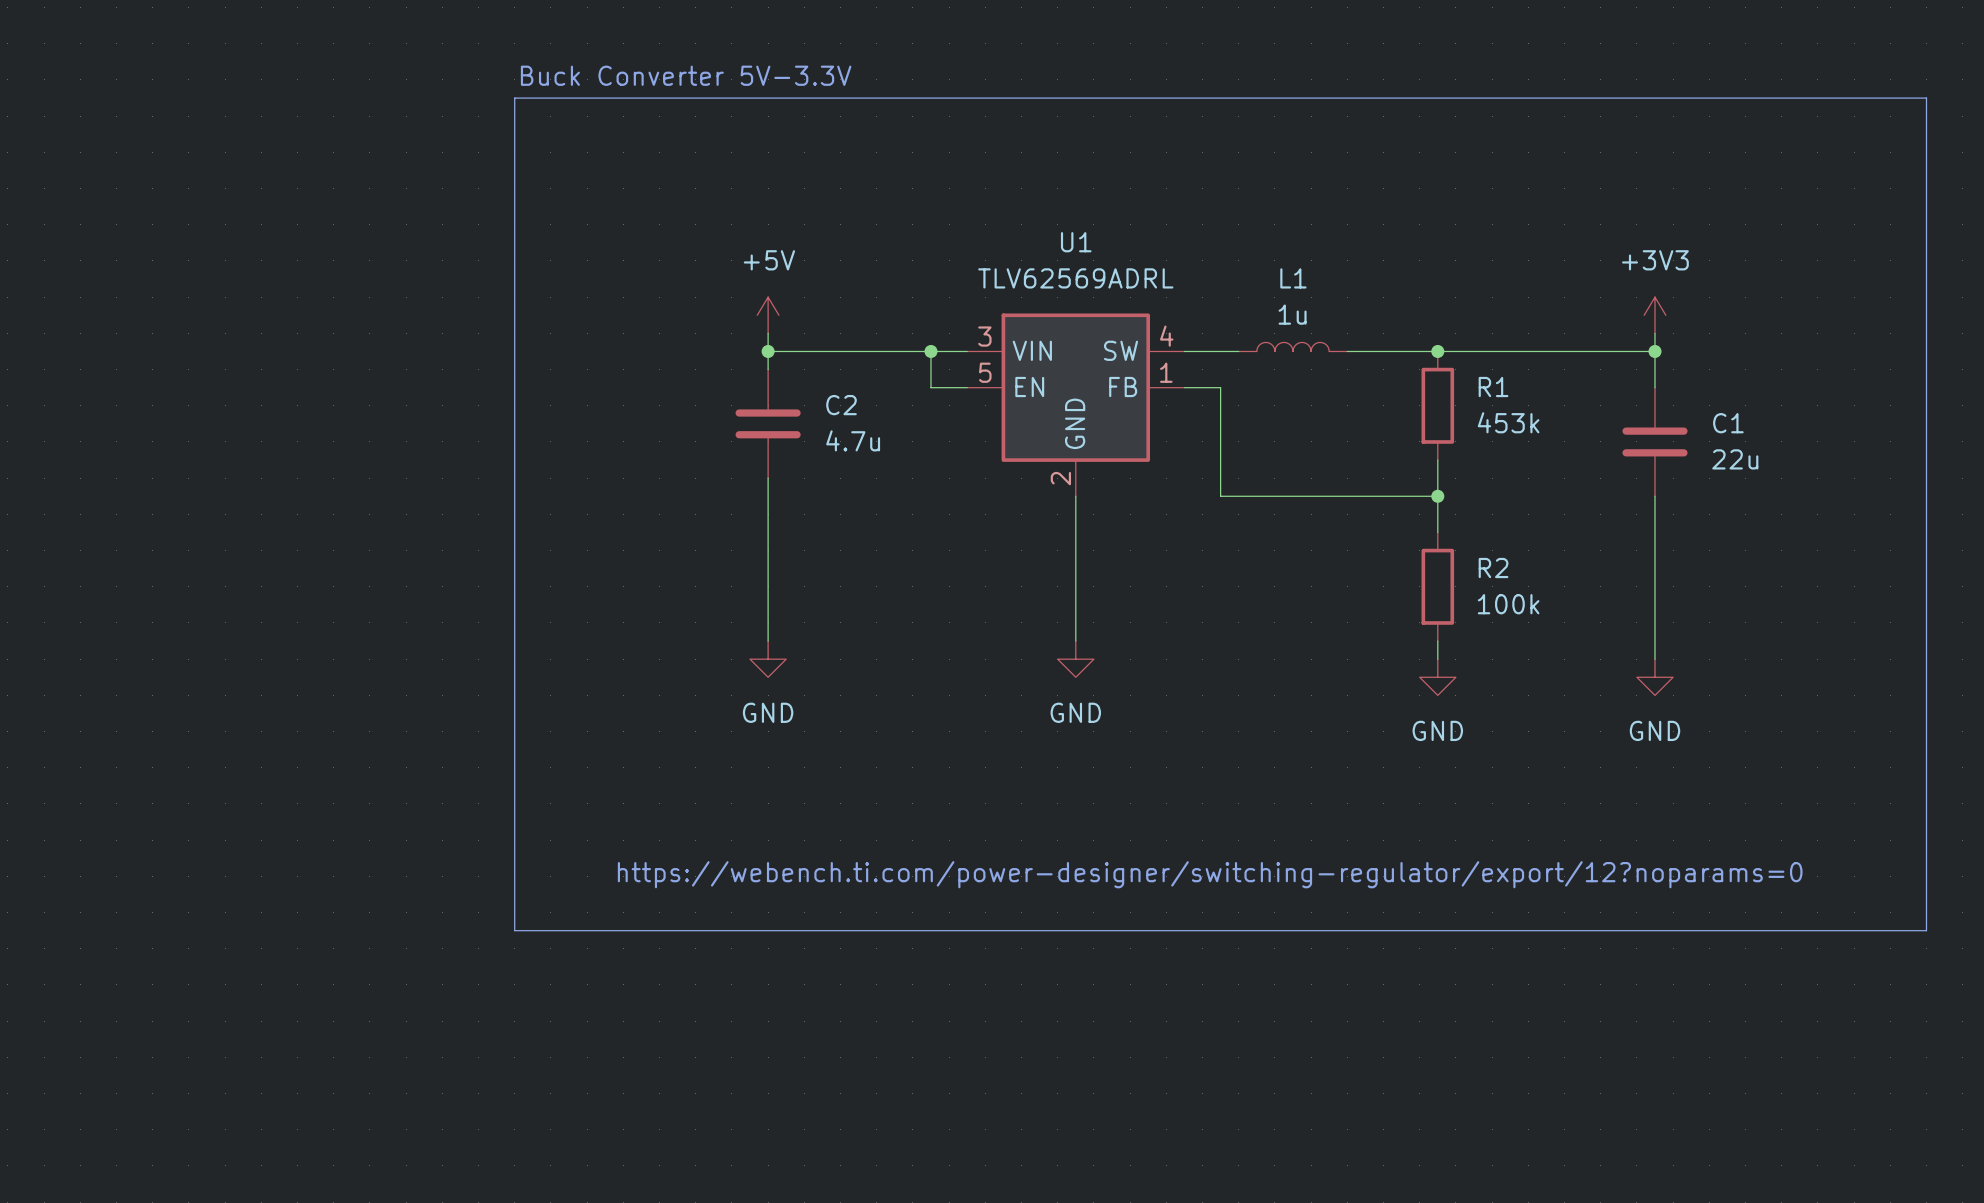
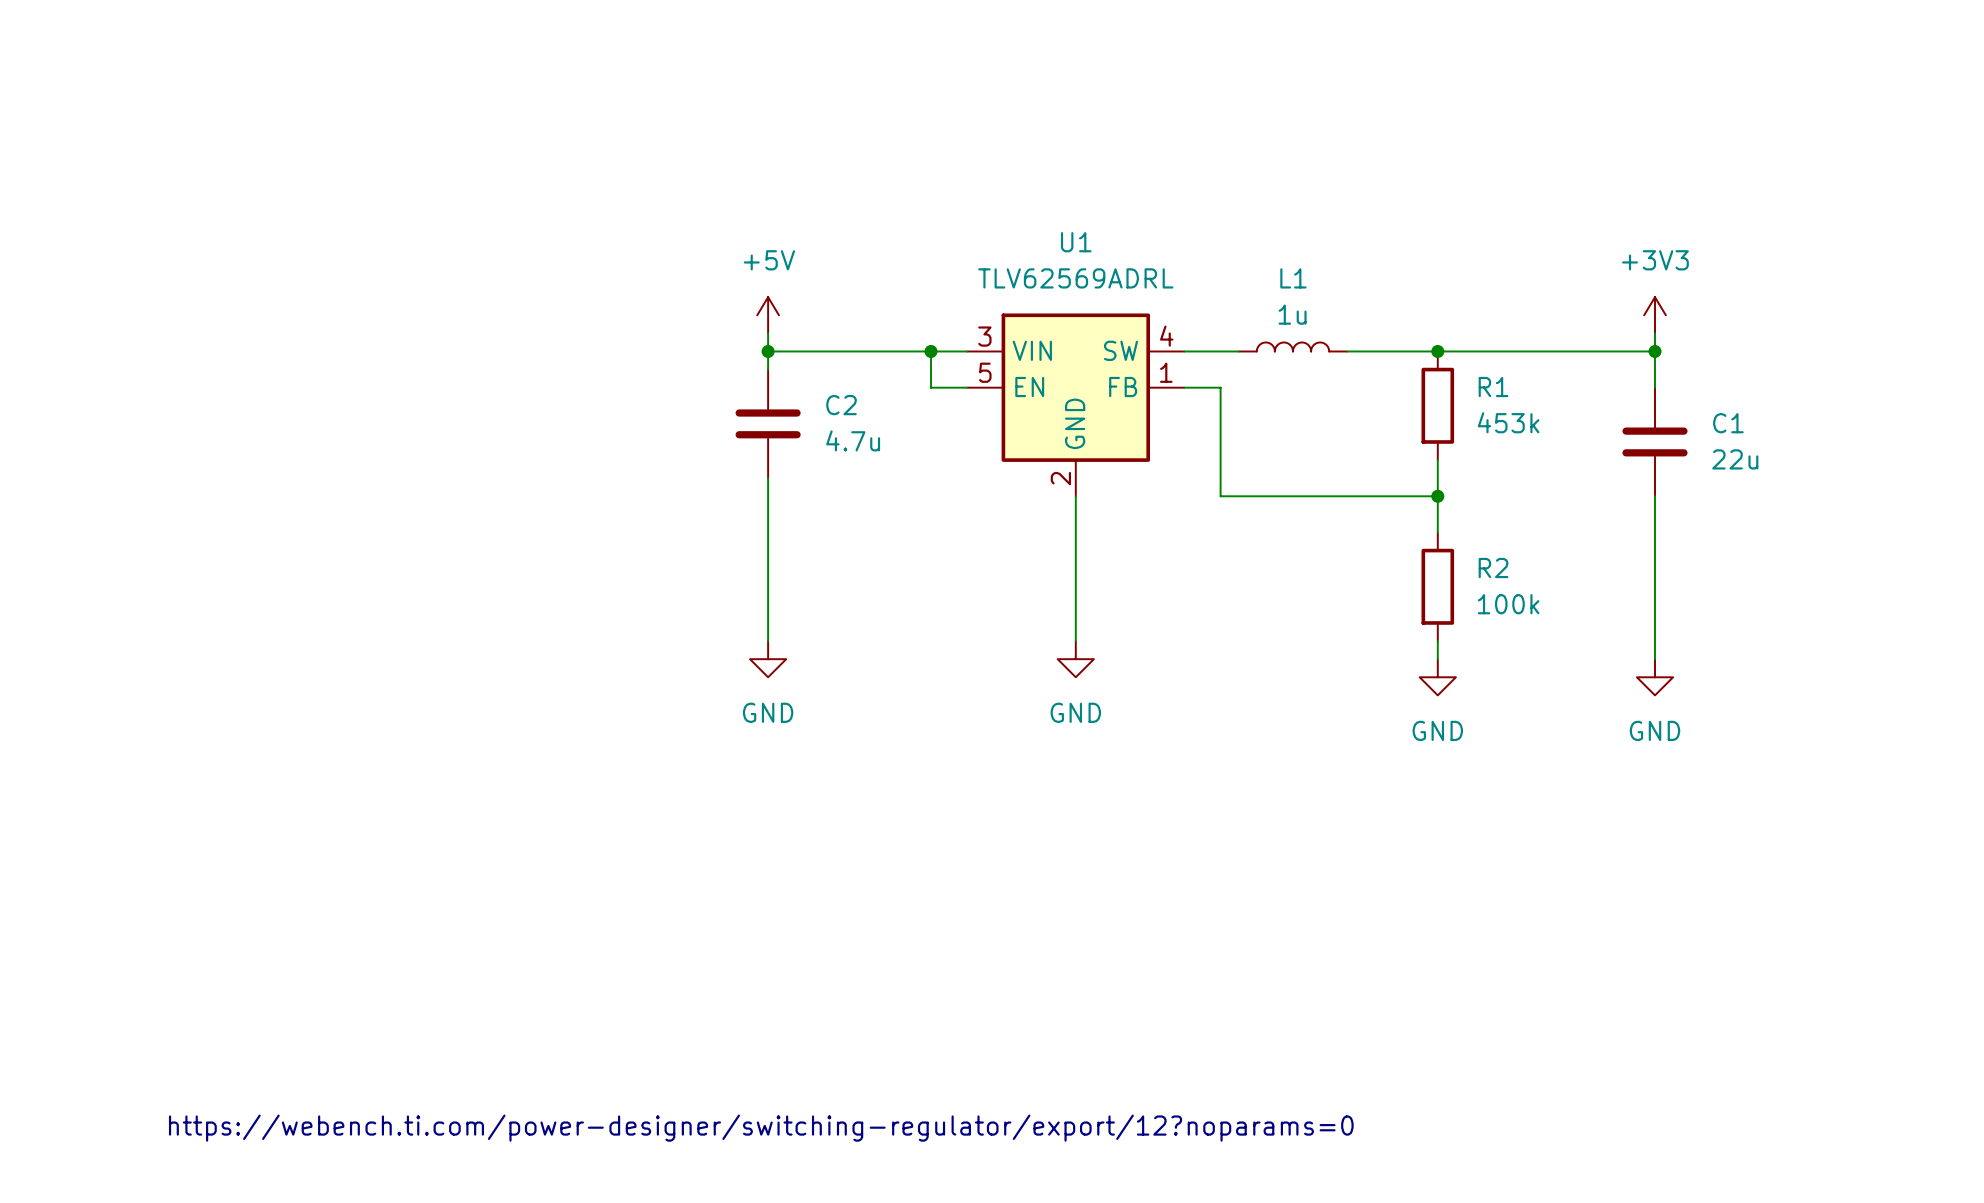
text: Buck Converter 5V-3.3V (686, 75) -> none
line: (514, 98) (1926, 98) (1926, 930) (514, 930) (514, 98) -> none
text: https://webench.ti.com/power-designer/switching-regulator/export/12?noparams=0 (1210, 874) -> none
text: none -> https://webench.ti.com/power-designer/switching-regulator/export/12?noparams=0 (761, 1128)

